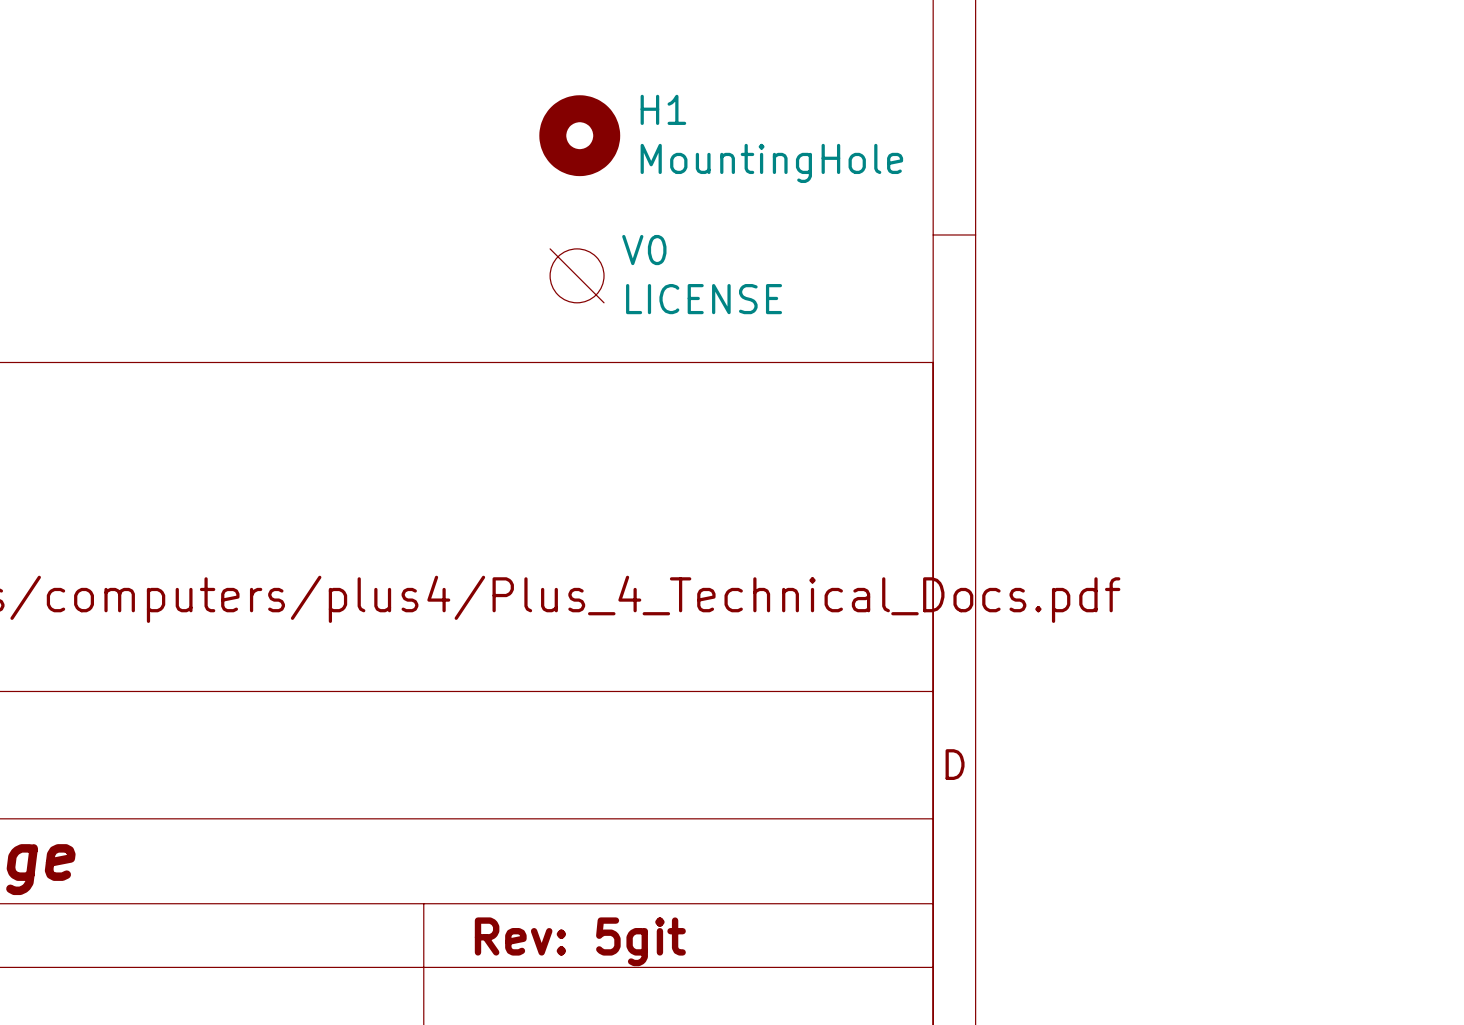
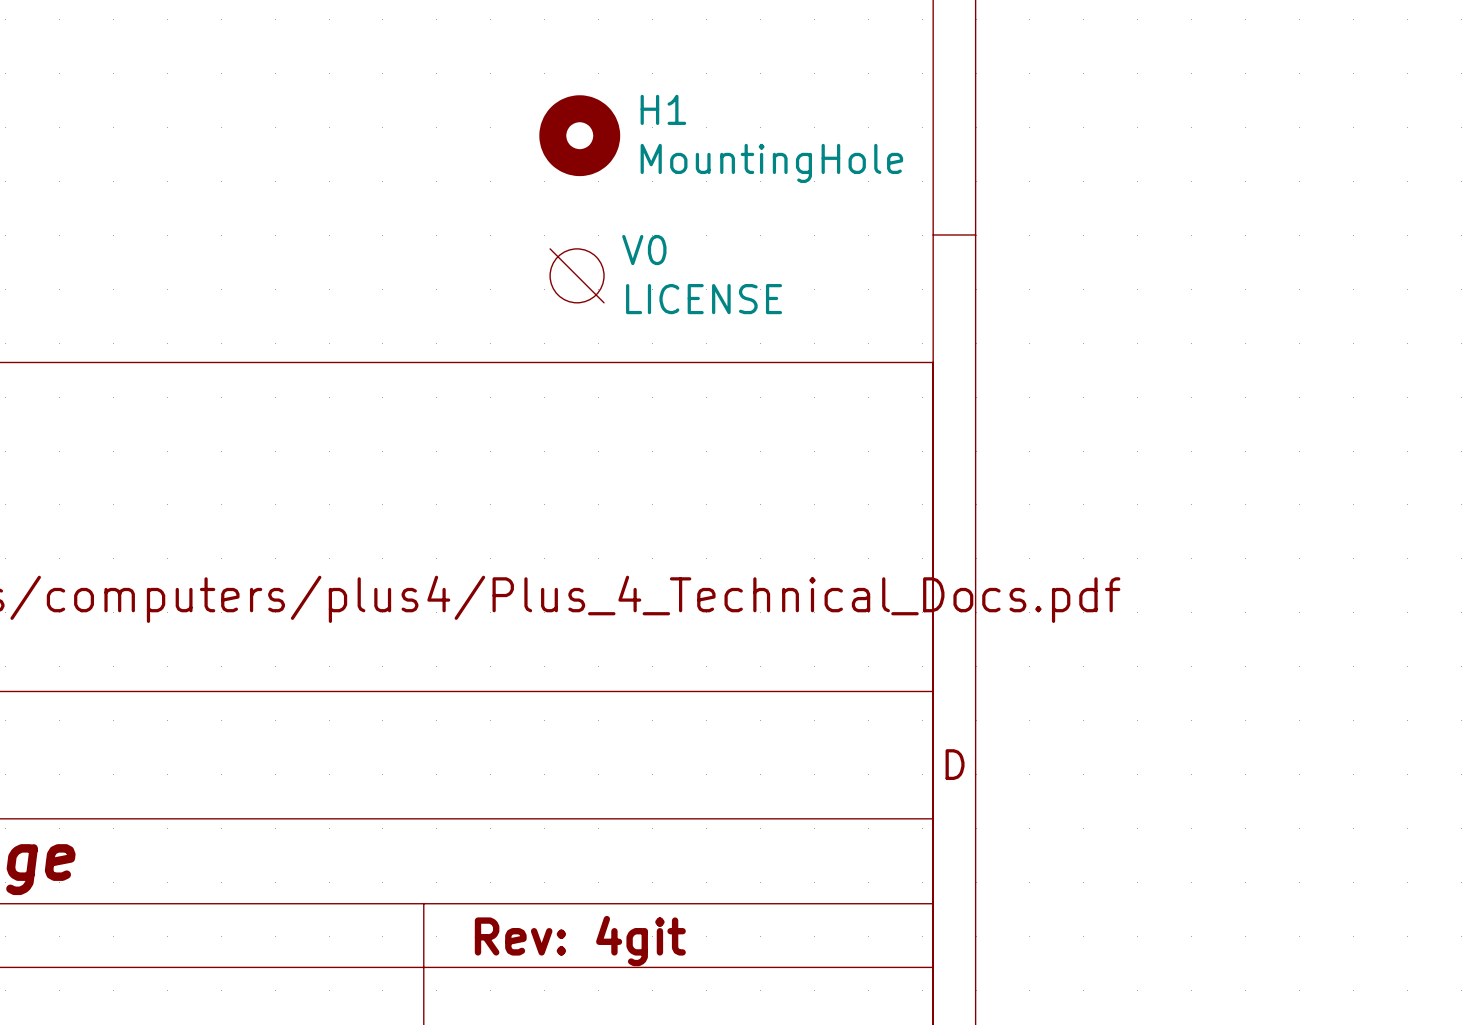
title block: Rev: 5git (580, 941) -> Rev: 4git (580, 941)

